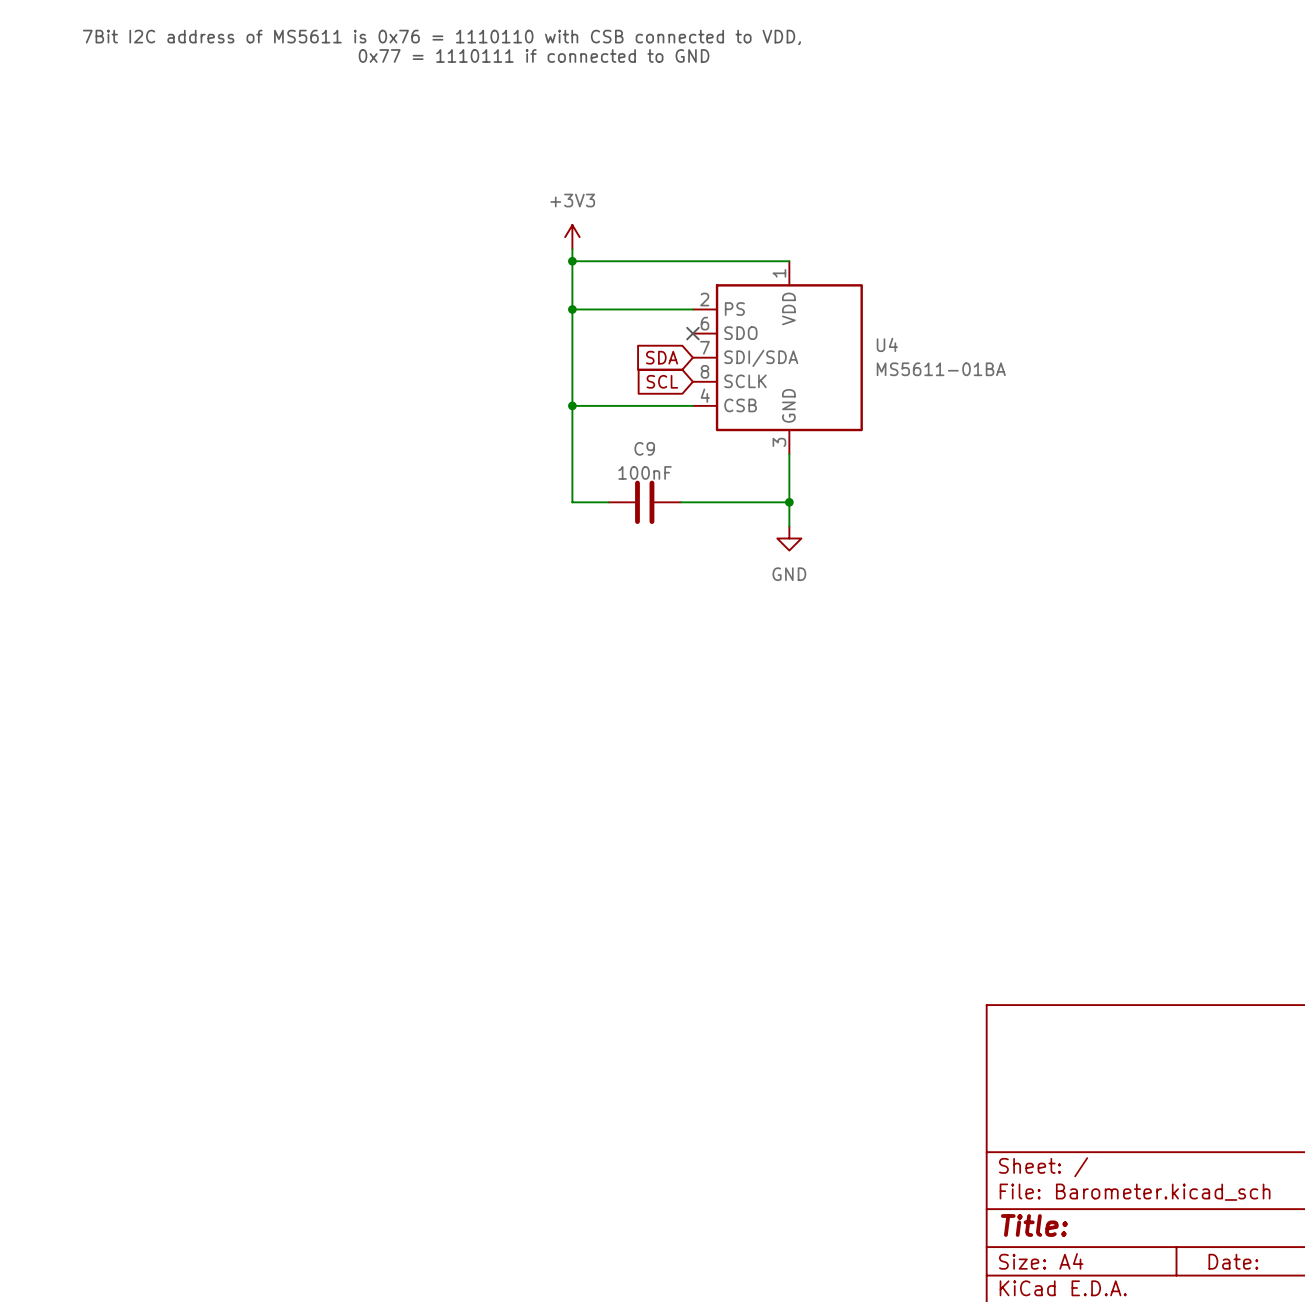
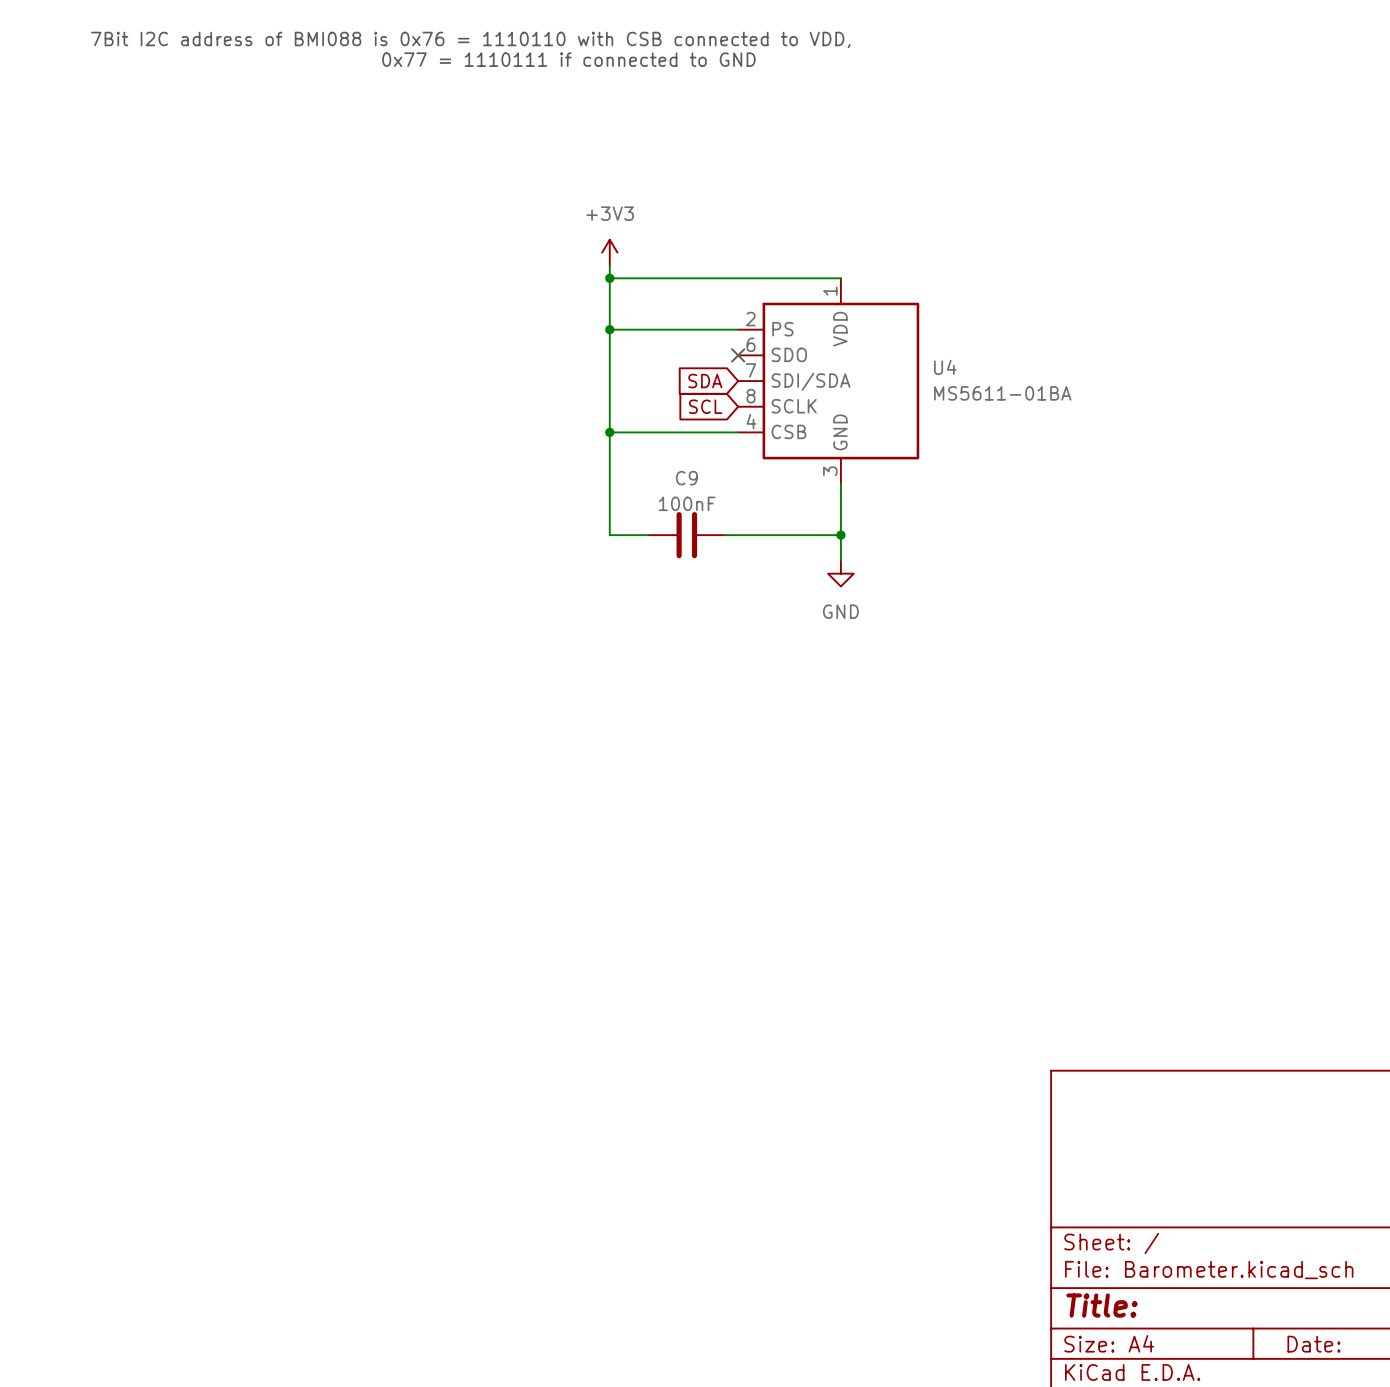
text: 7Bit I2C address of MS5611 is 0x76 = 1110110 with CSB connected to VDD, (441, 37) -> 7Bit I2C address of BMI088 is 0x76 = 1110110 with CSB connected to VDD, (470, 39)

